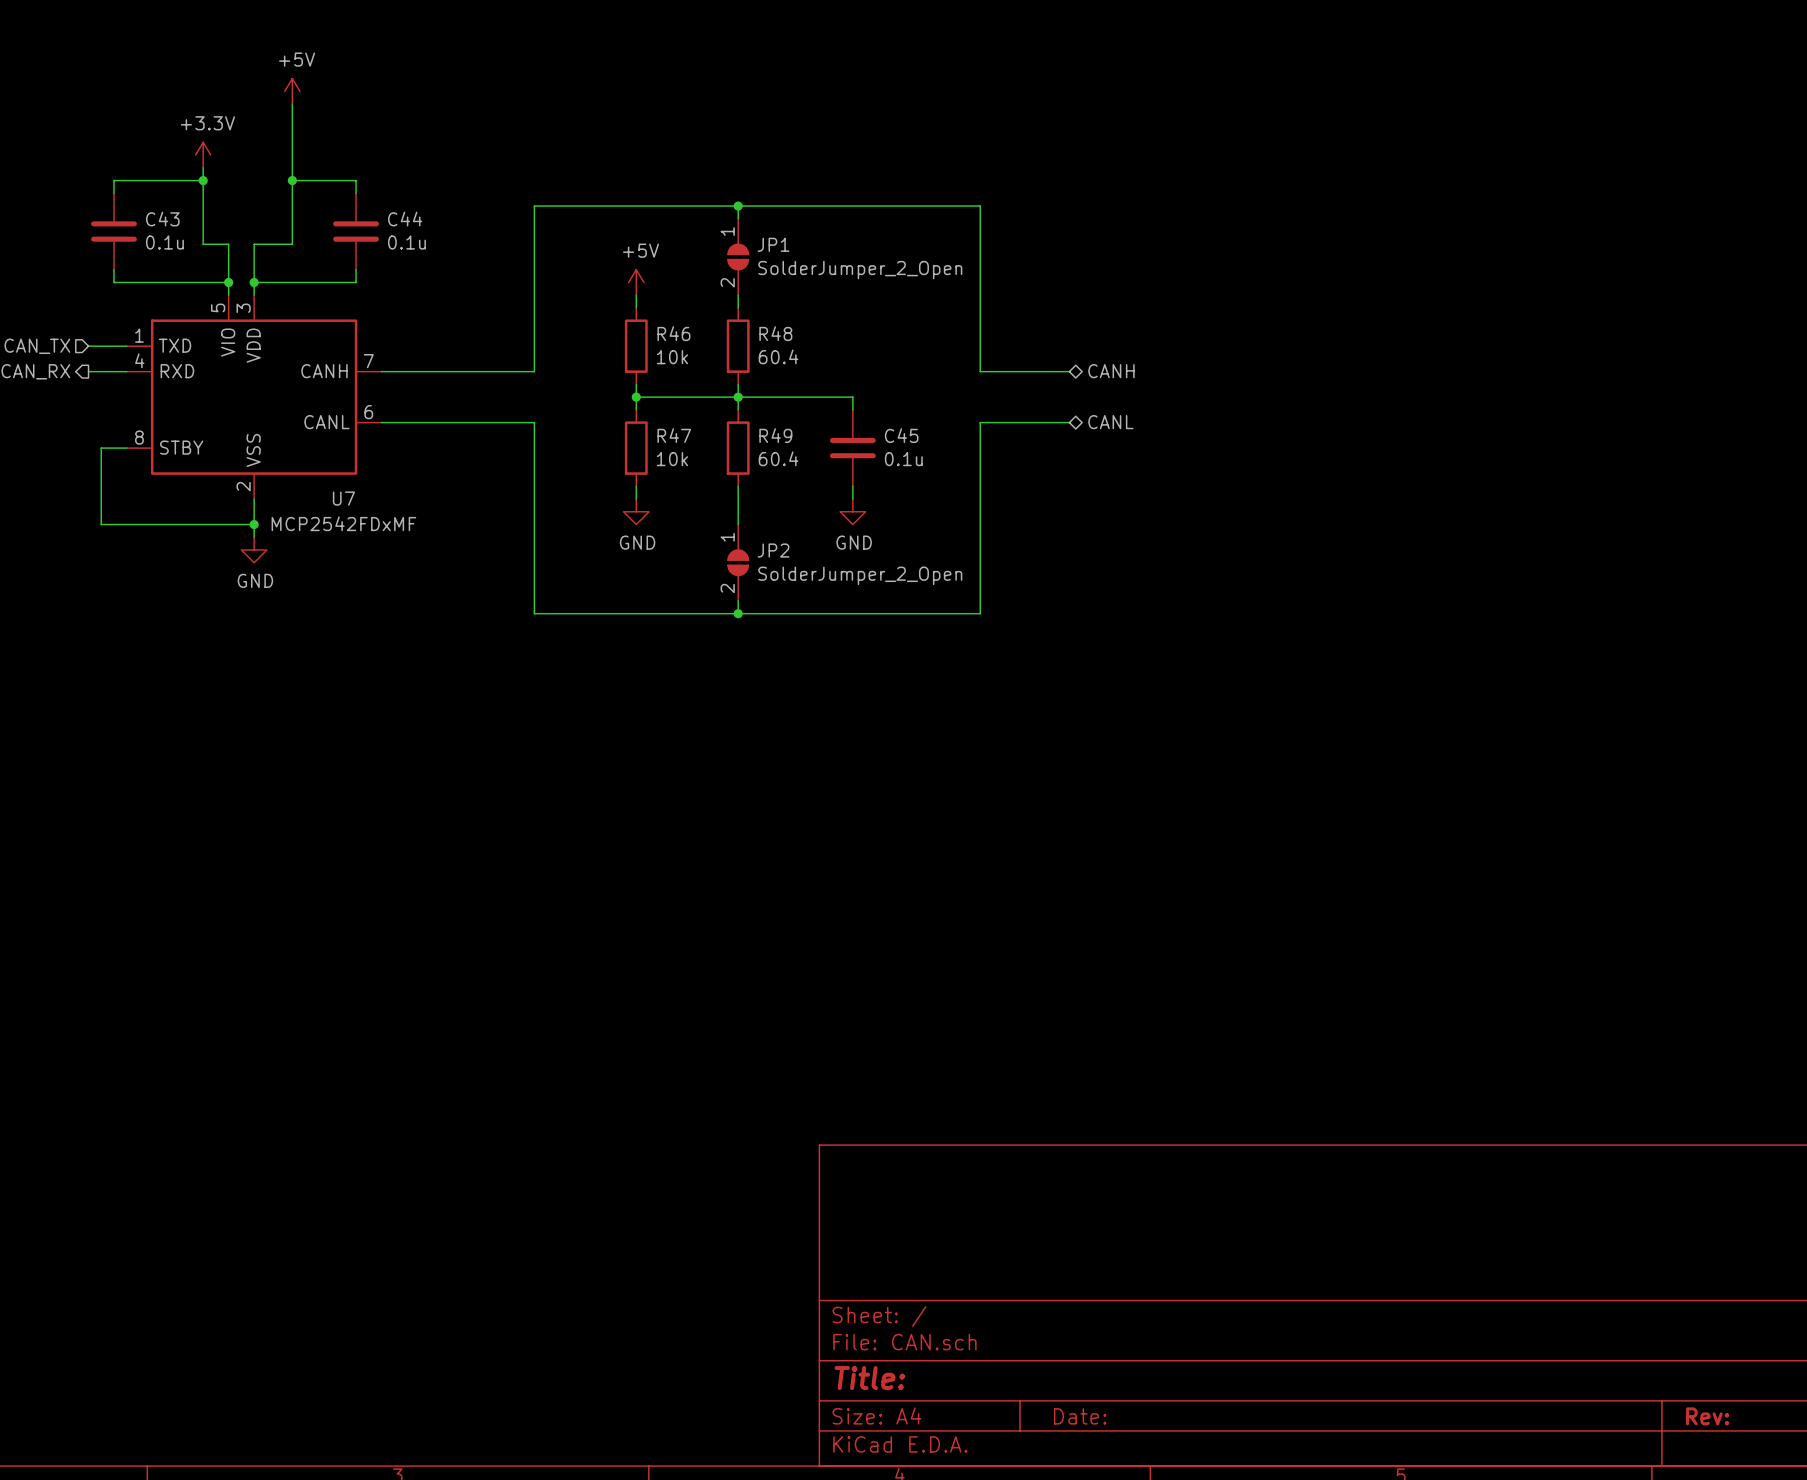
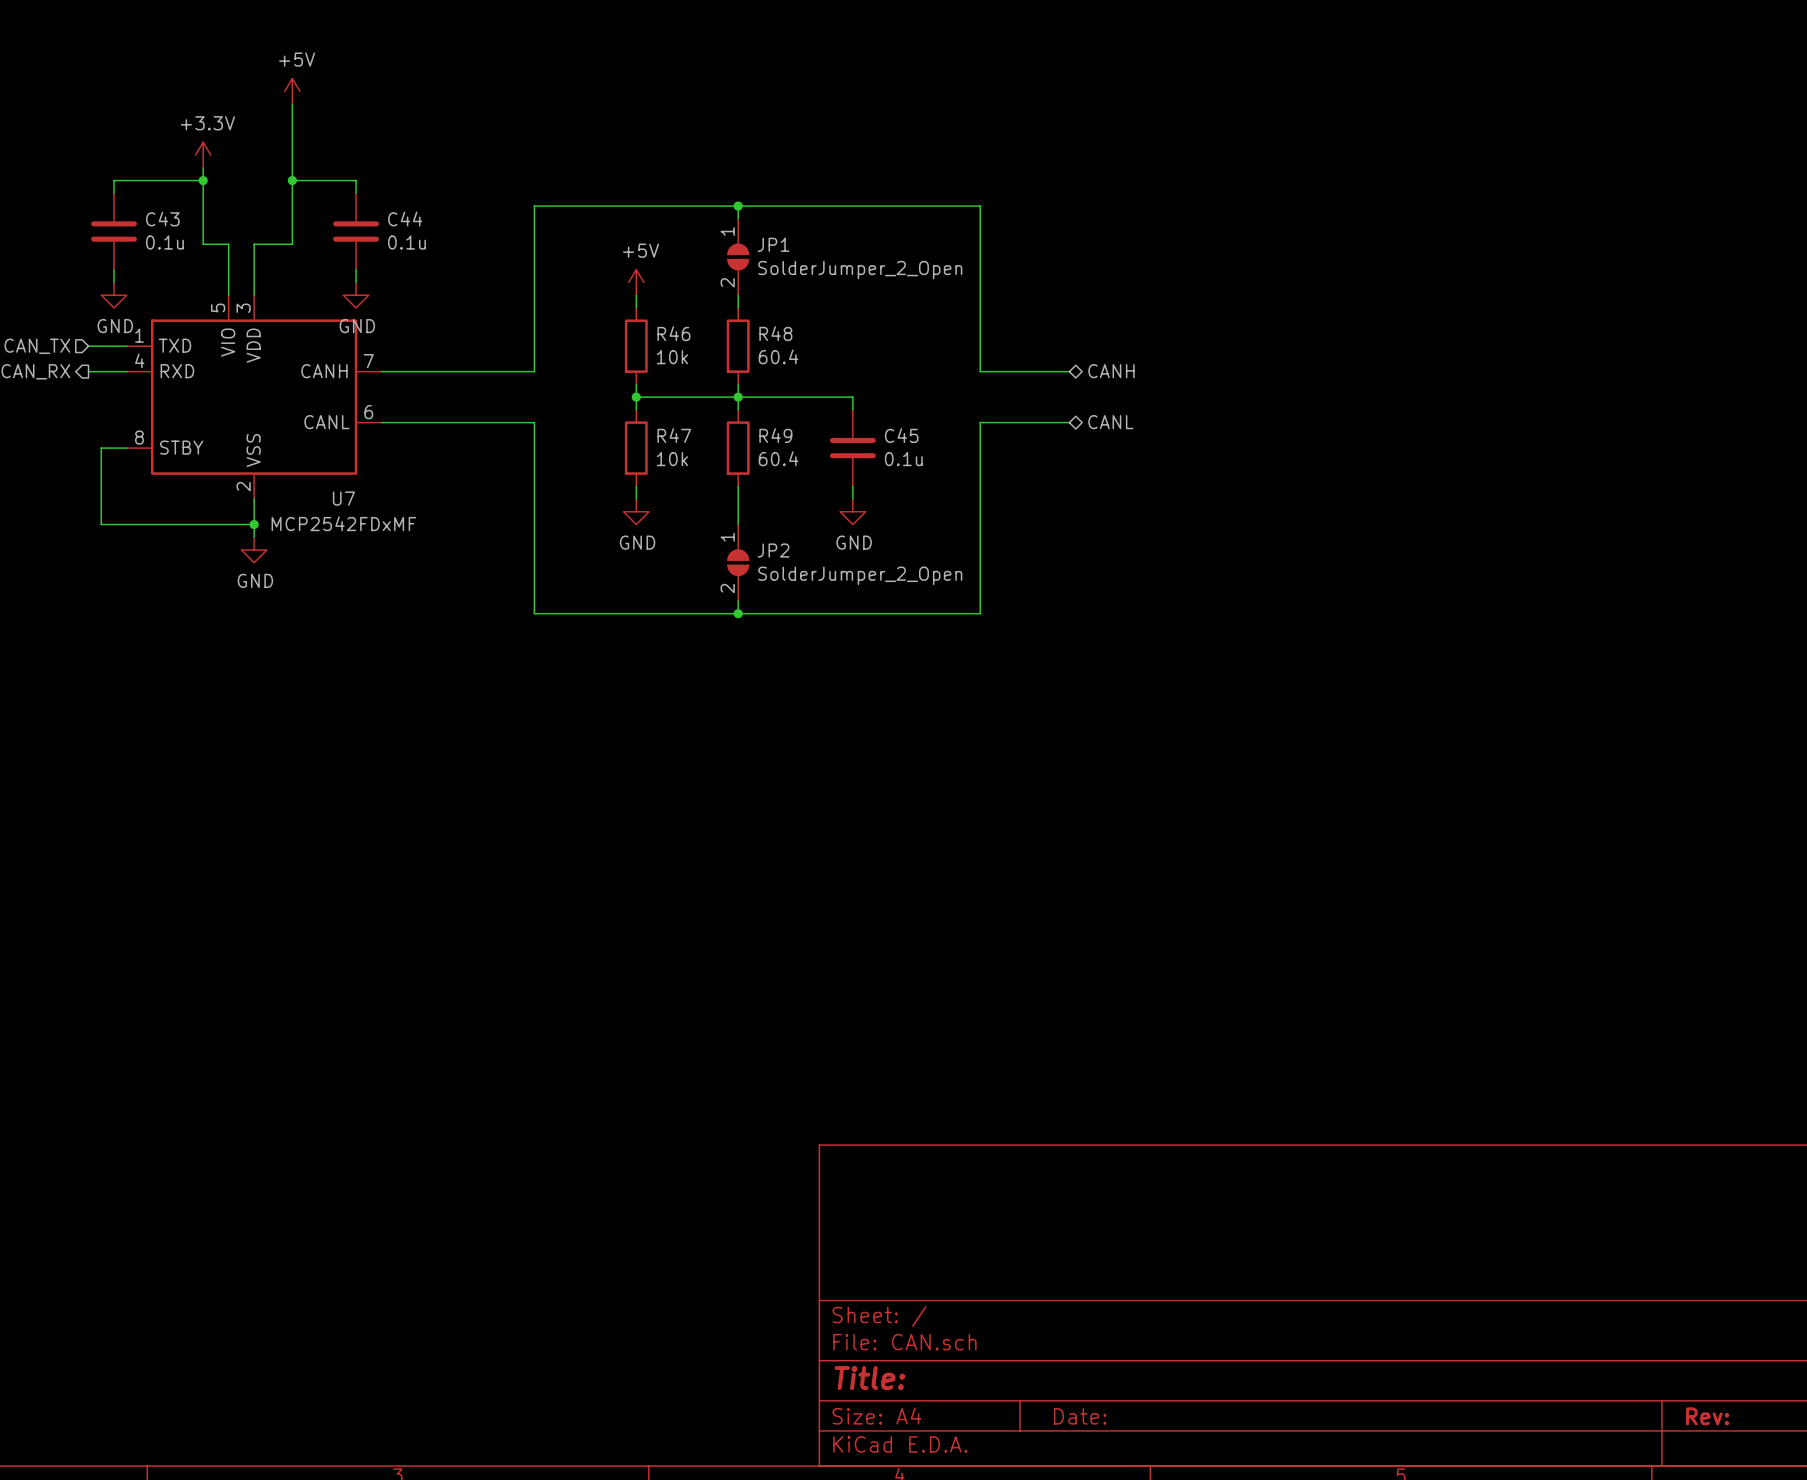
wire: (114, 282) (228, 282) -> none
junction: (228, 282) -> none
wire: (254, 282) (356, 282) -> none
junction: (254, 282) -> none
power symbol: none -> GND (114, 295)
power symbol: none -> GND (356, 295)

